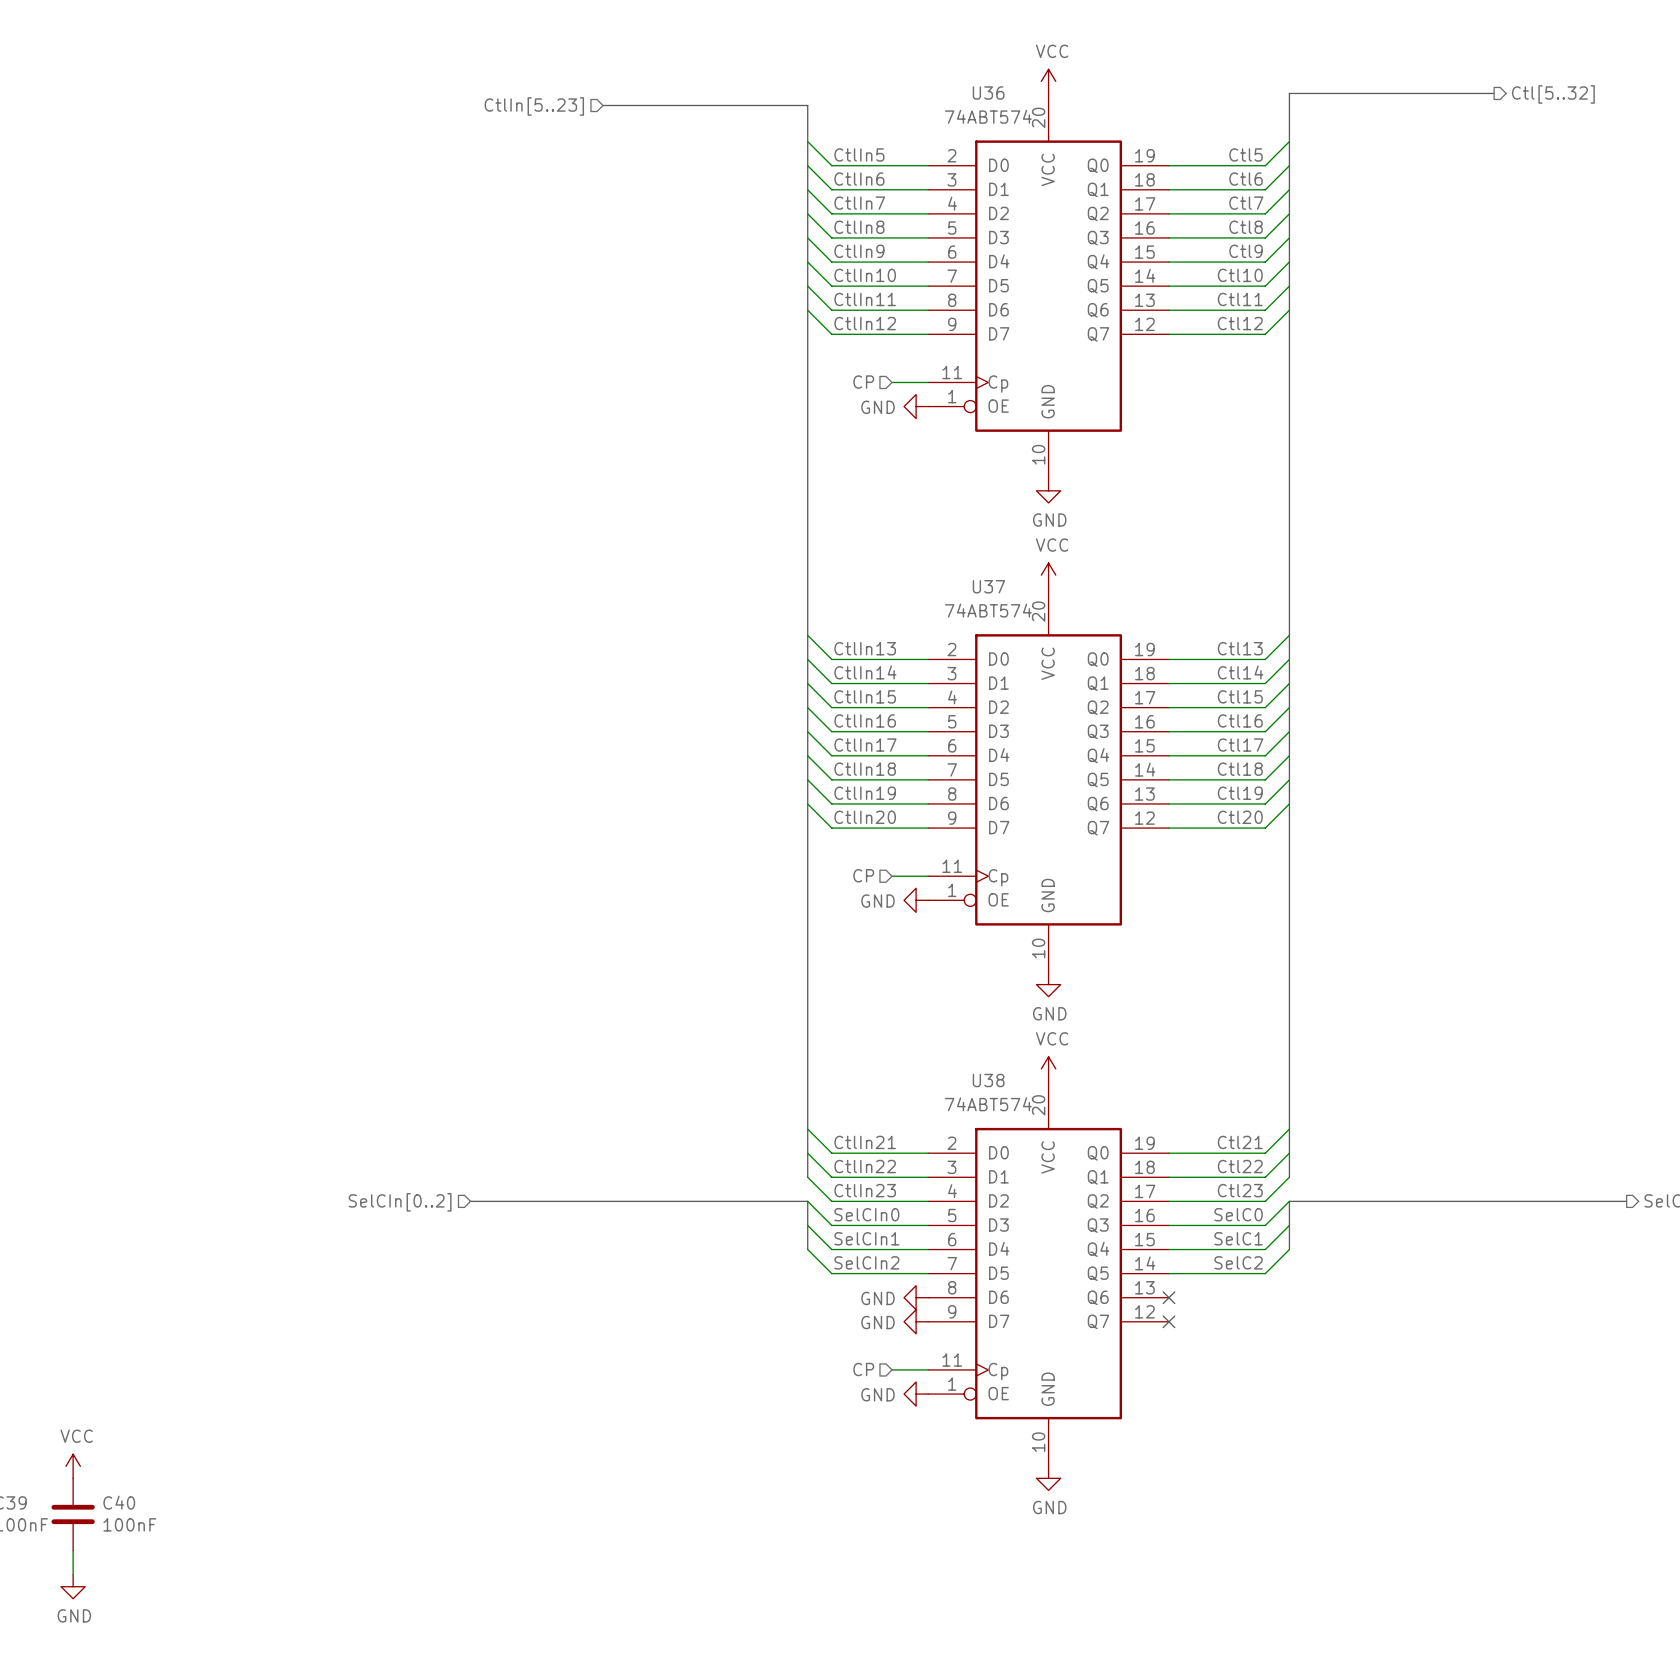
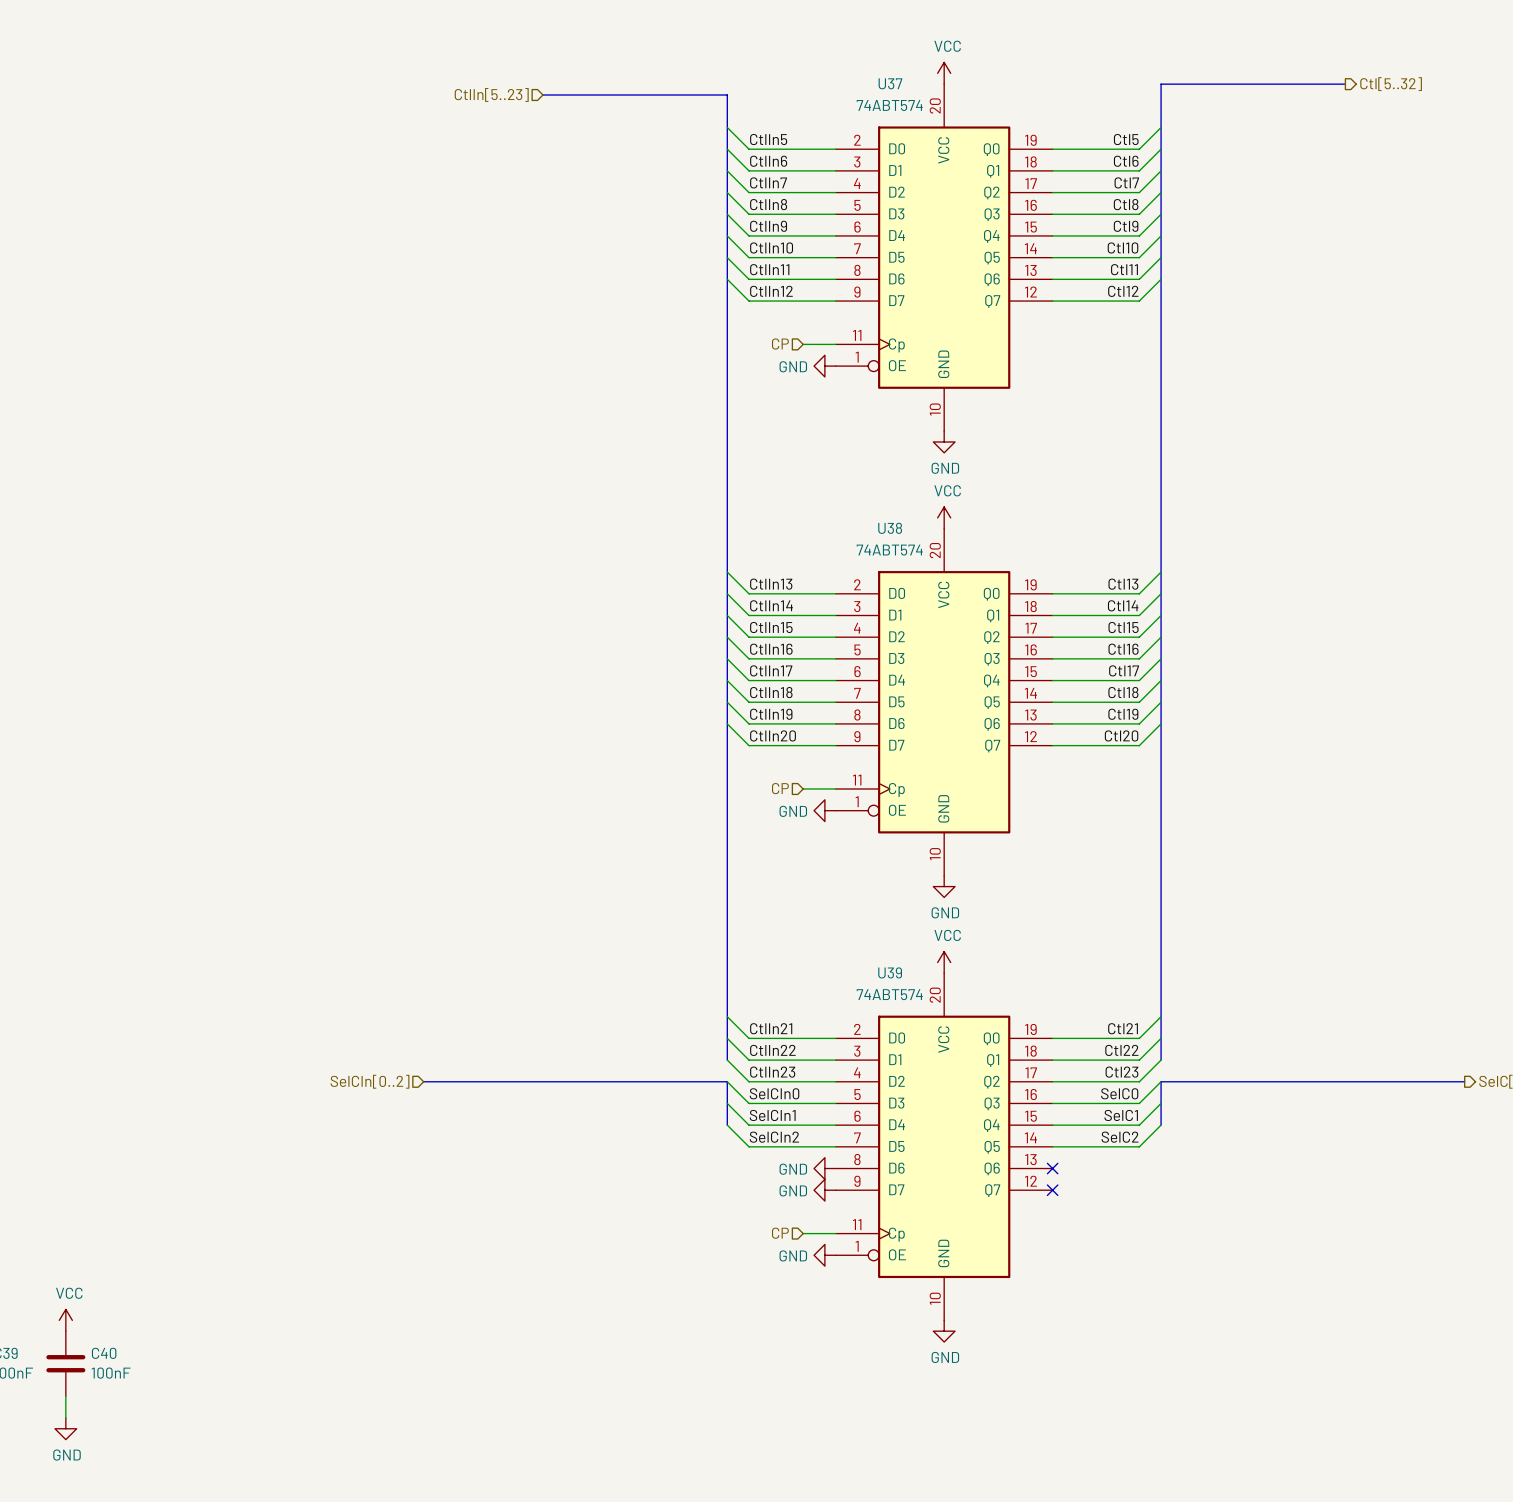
U36 name: U36 (988, 93) -> U37 (890, 83)
U37 name: U37 (988, 586) -> U38 (890, 528)
U38 name: U38 (988, 1080) -> U39 (890, 972)

